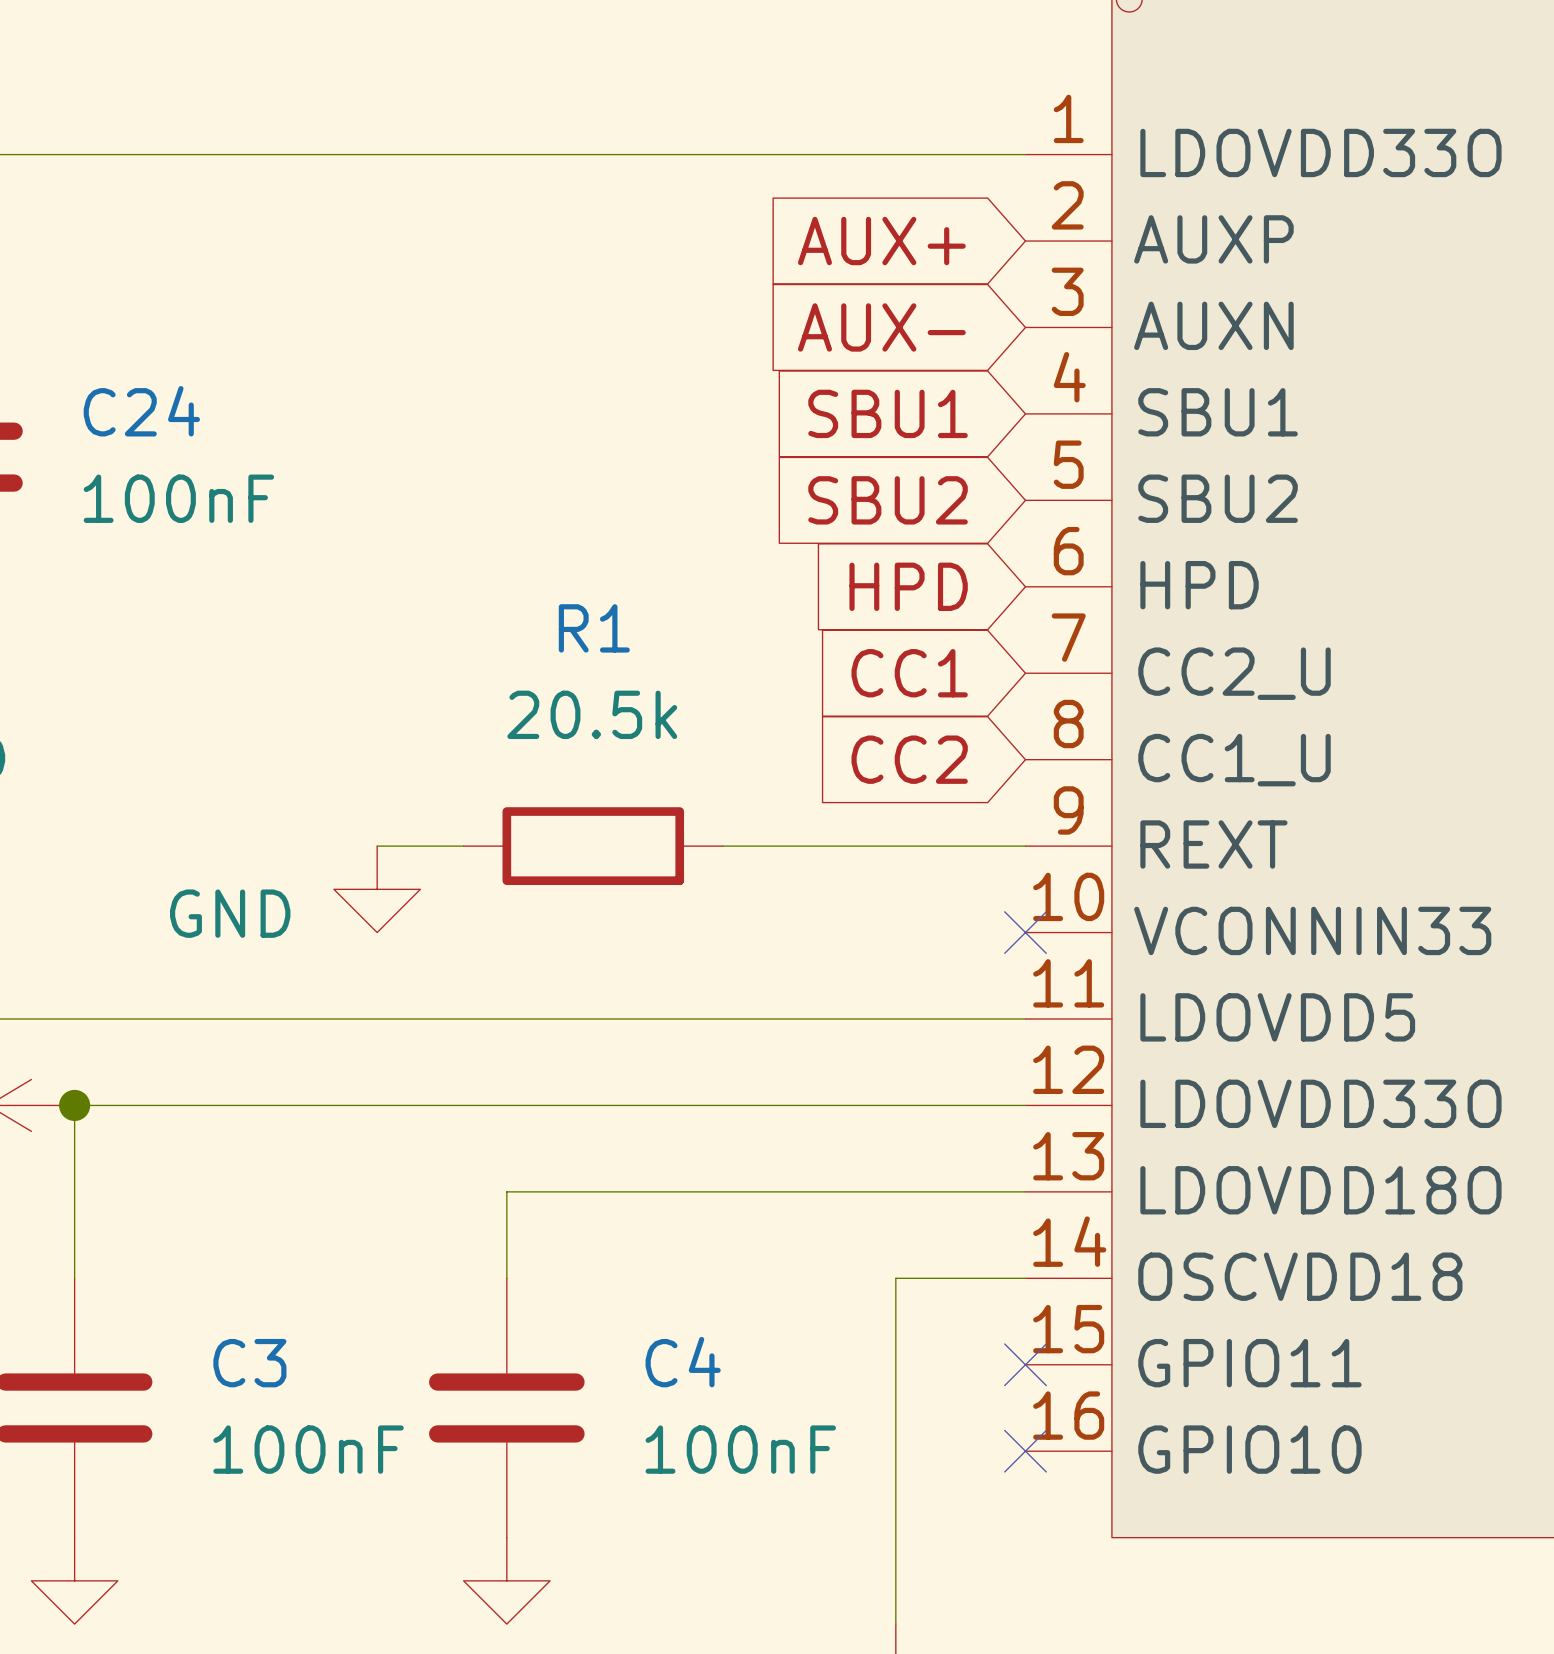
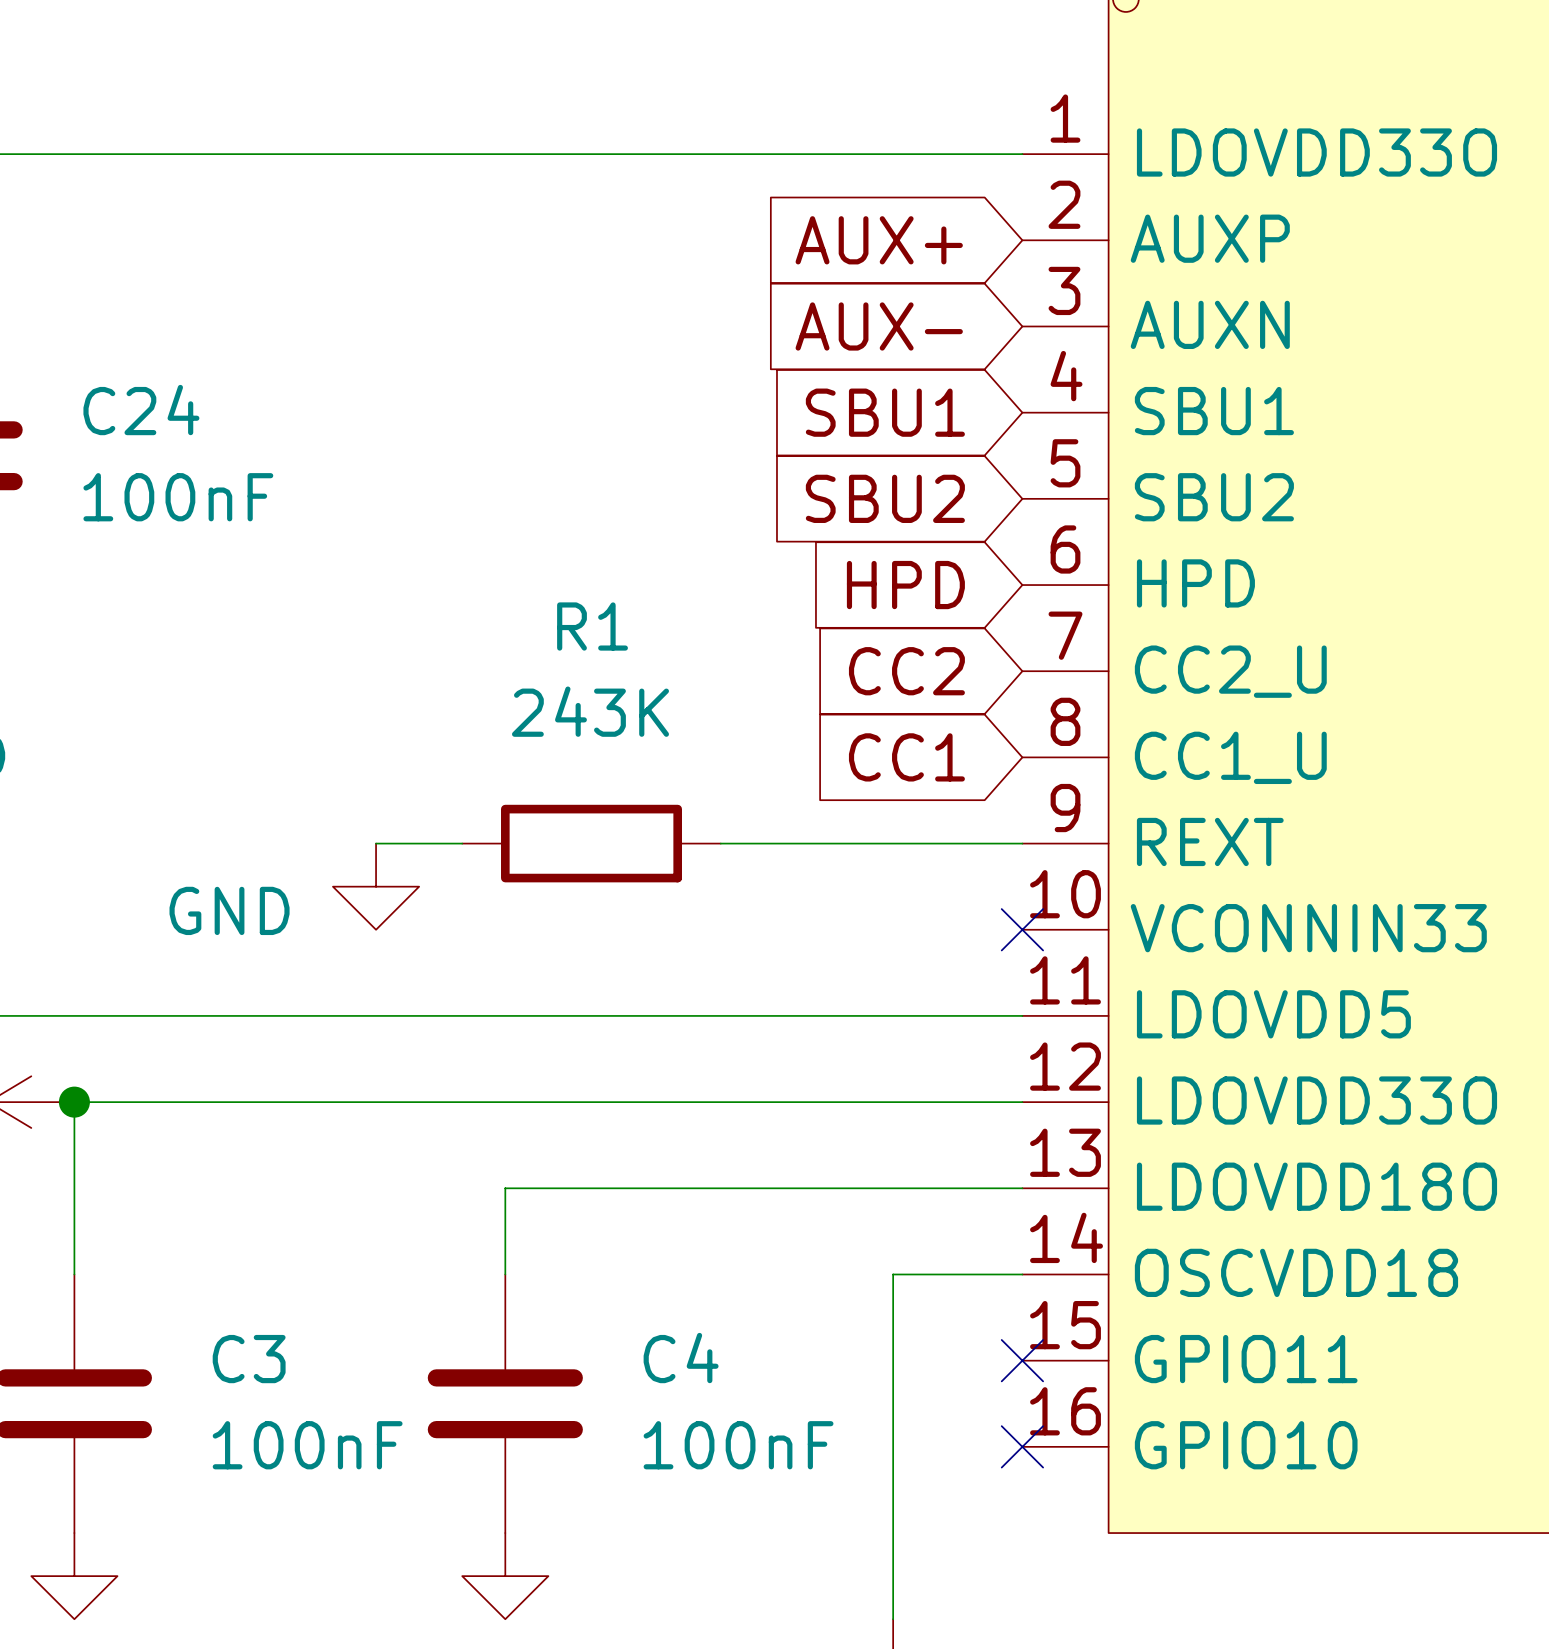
global label: CC1 (909, 673) -> CC2 (906, 671)
R1 value: 20.5k (592, 714) -> 243K (590, 711)
global label: CC2 (909, 759) -> CC1 (906, 757)

